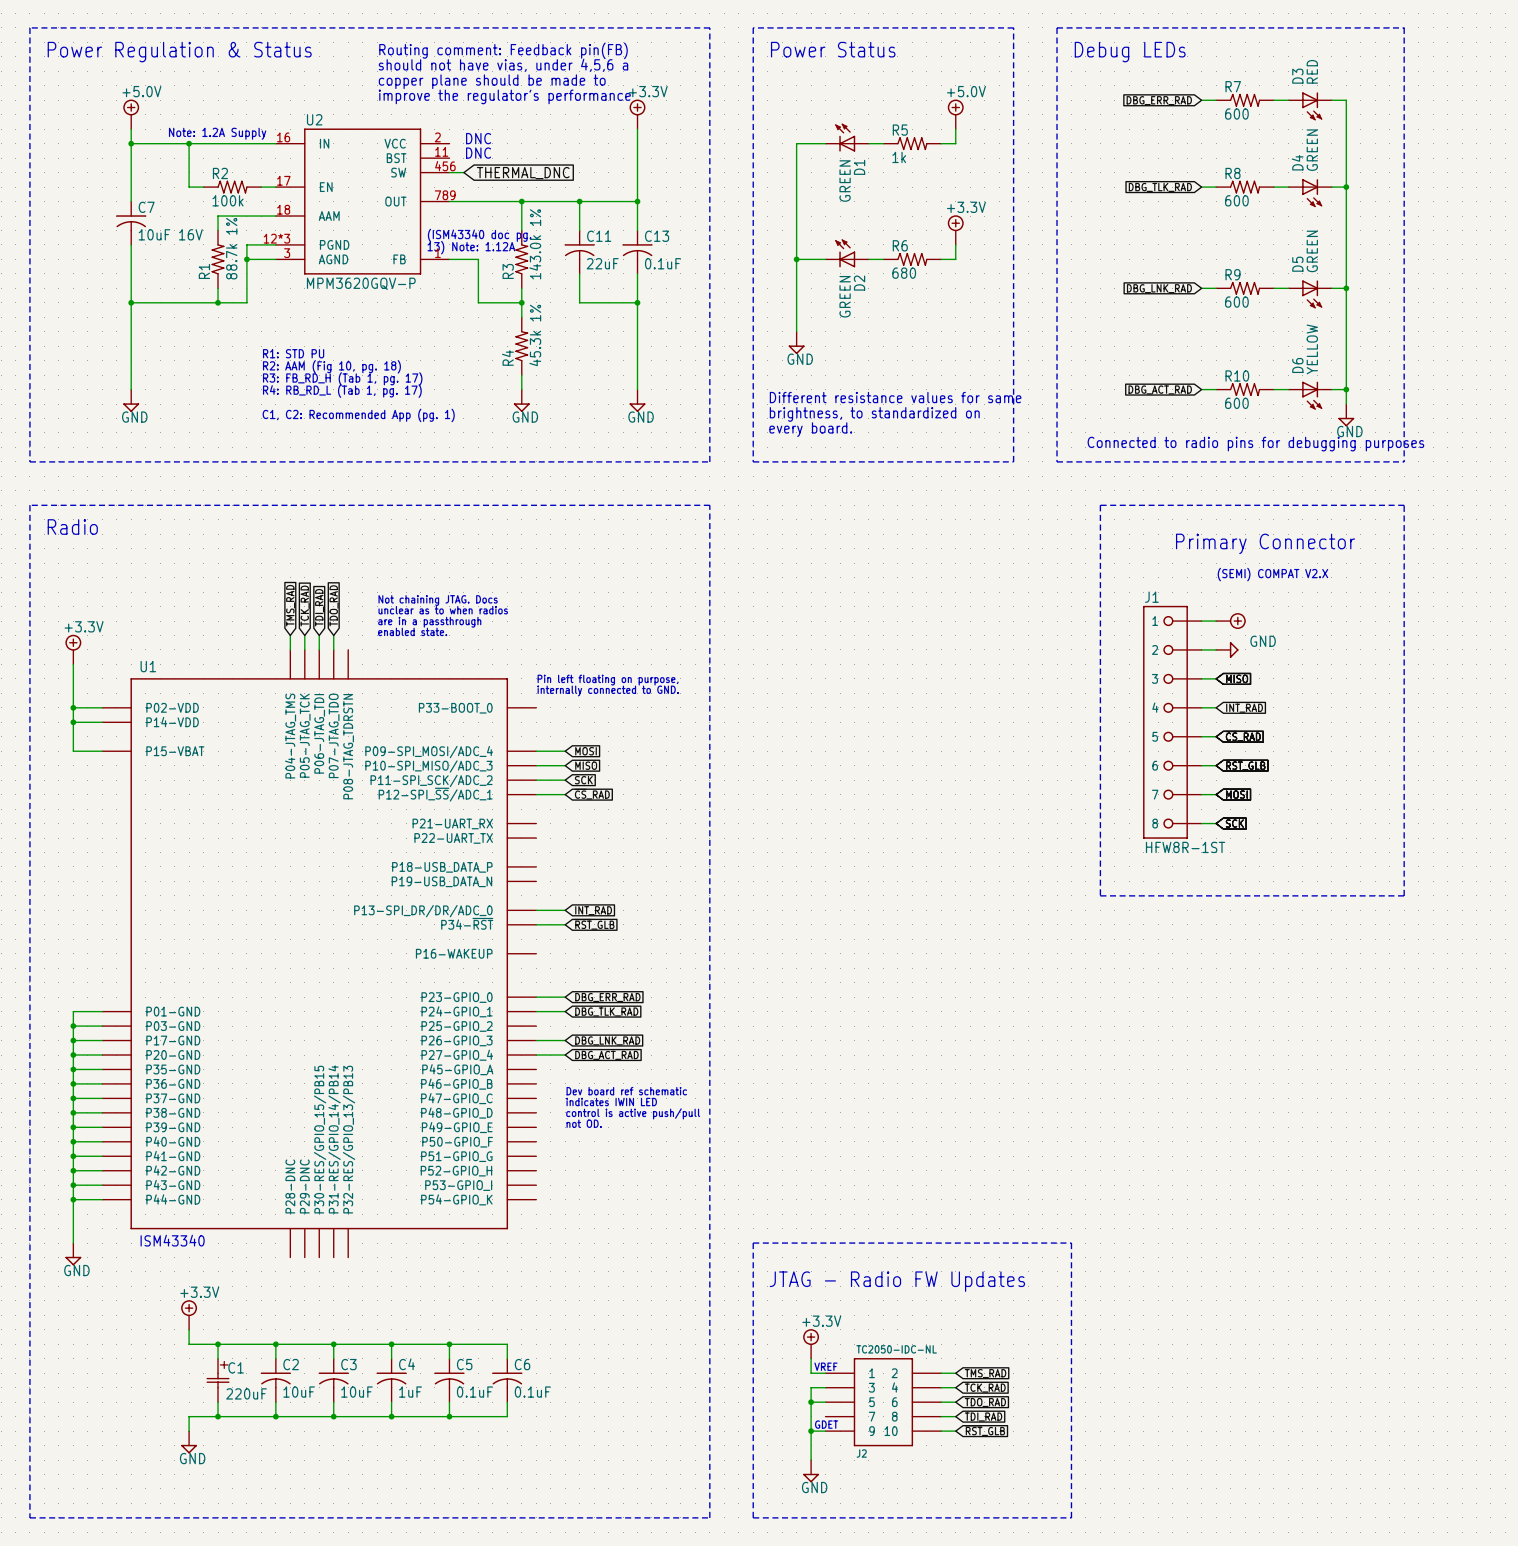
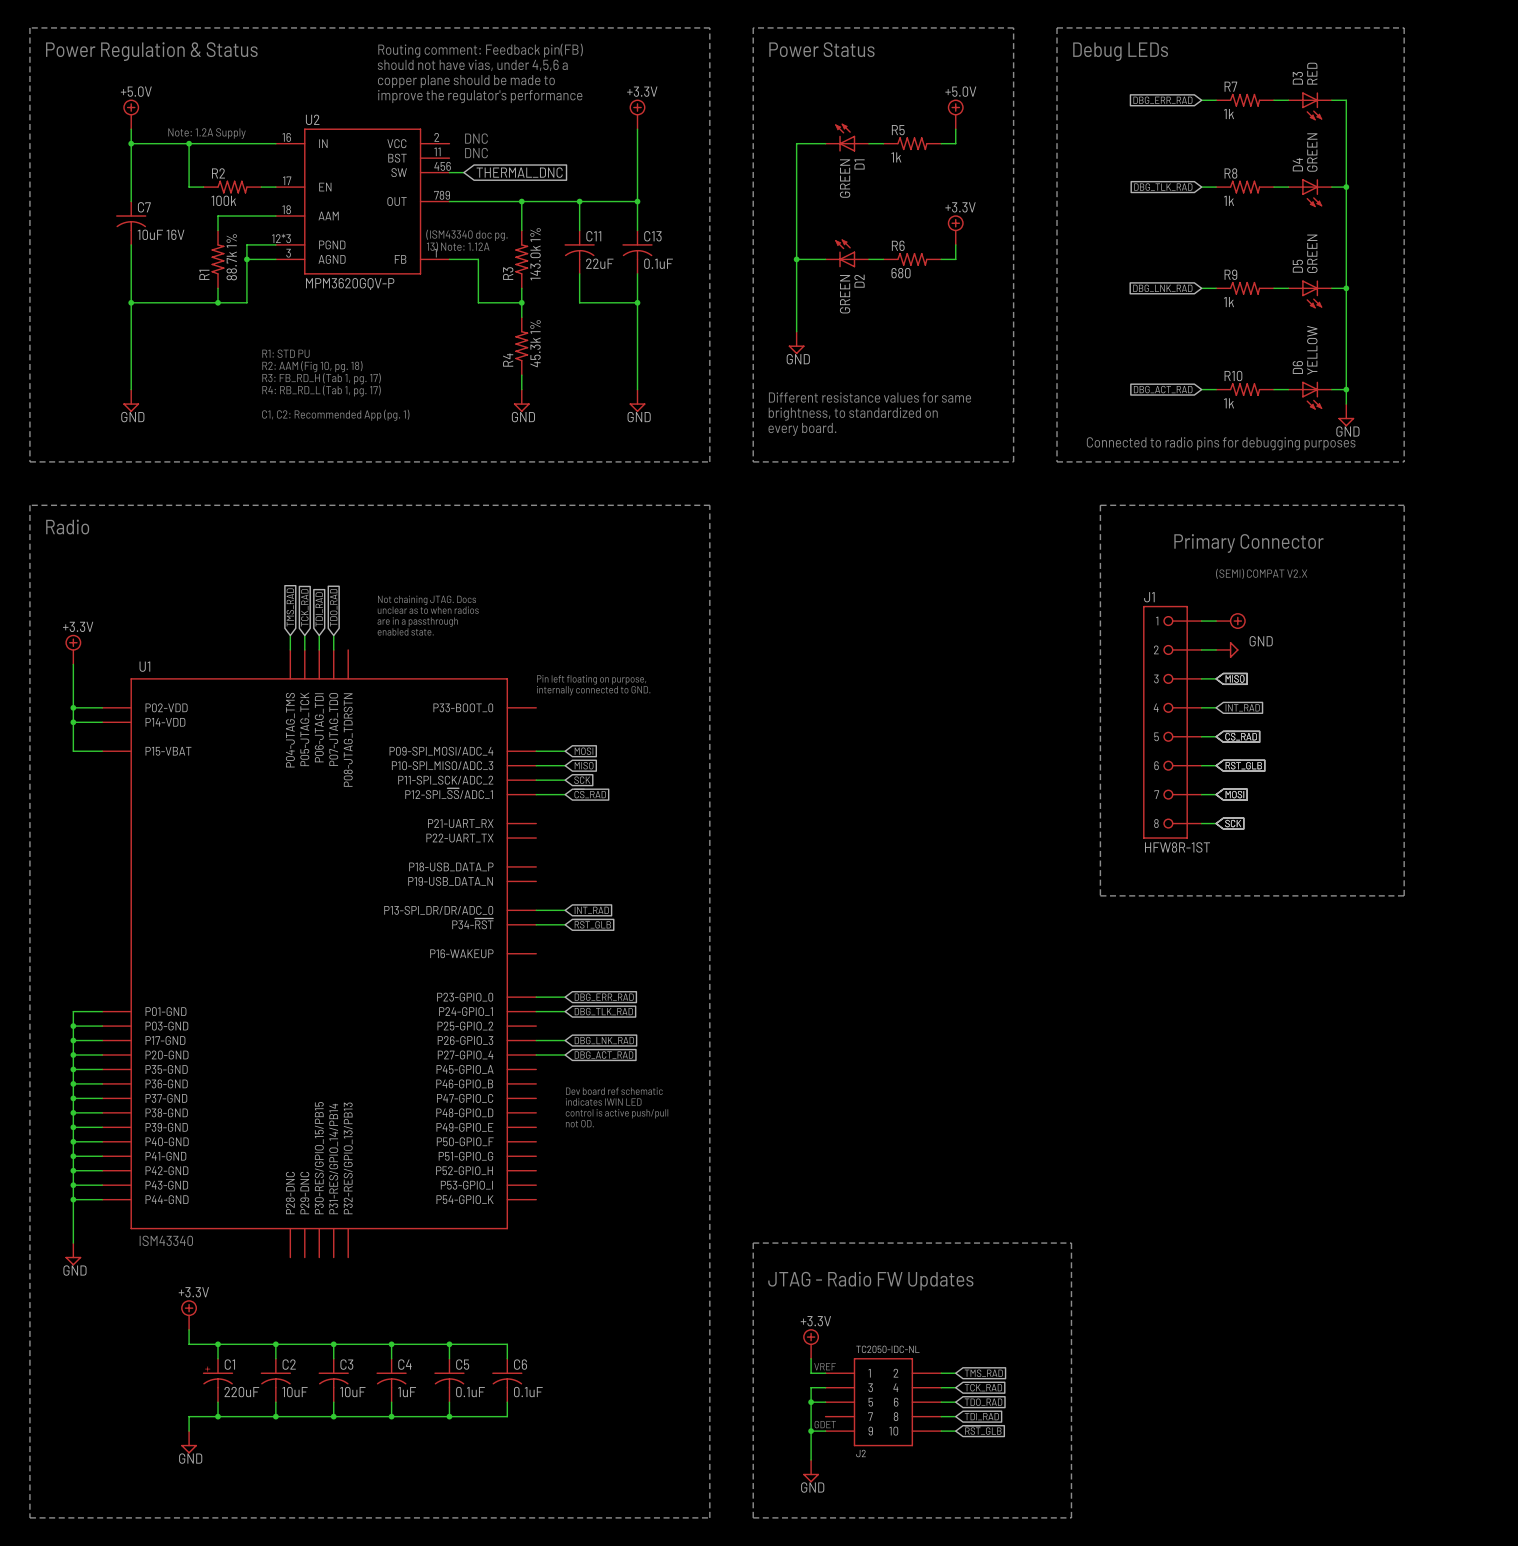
R7 value: 600 (1236, 114) -> 1k (1229, 114)
R8 value: 600 (1236, 200) -> 1k (1229, 200)
R9 value: 600 (1236, 302) -> 1k (1229, 302)
R10 value: 600 (1236, 403) -> 1k (1229, 403)
C1 symbol: [206, 1358, 230, 1403] -> [202, 1358, 234, 1403]

